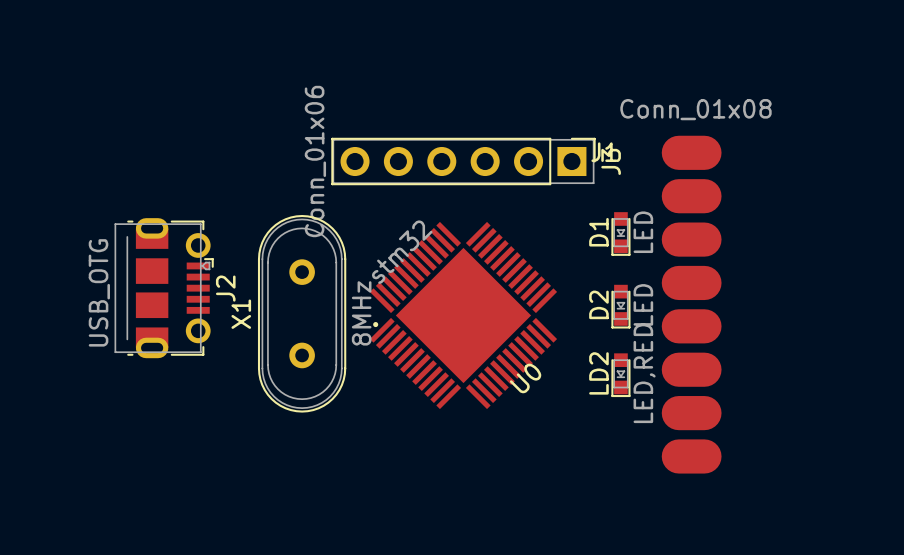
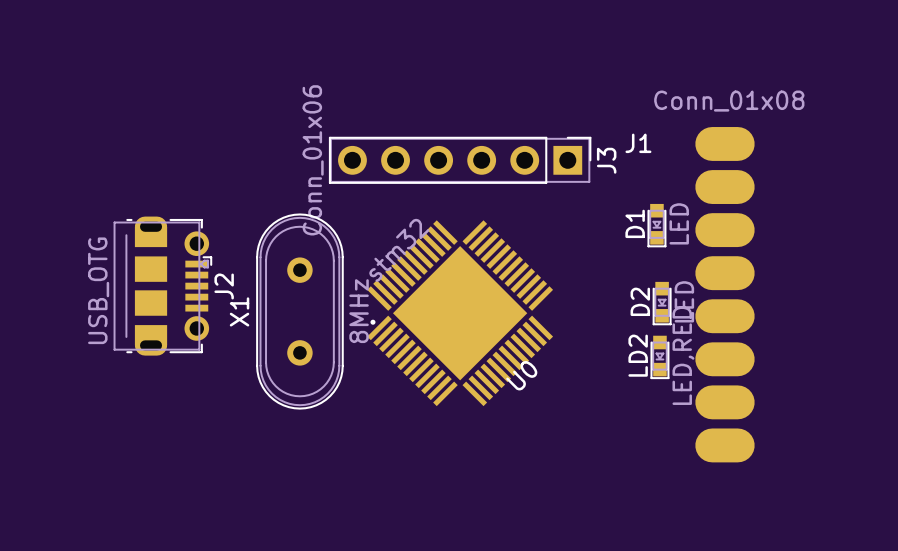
D1 position: (620, 234) -> (656, 225)
J1 position: (691, 304) -> (724, 294)
D2 position: (620, 306) -> (662, 303)
LD2 position: (620, 375) -> (659, 357)

